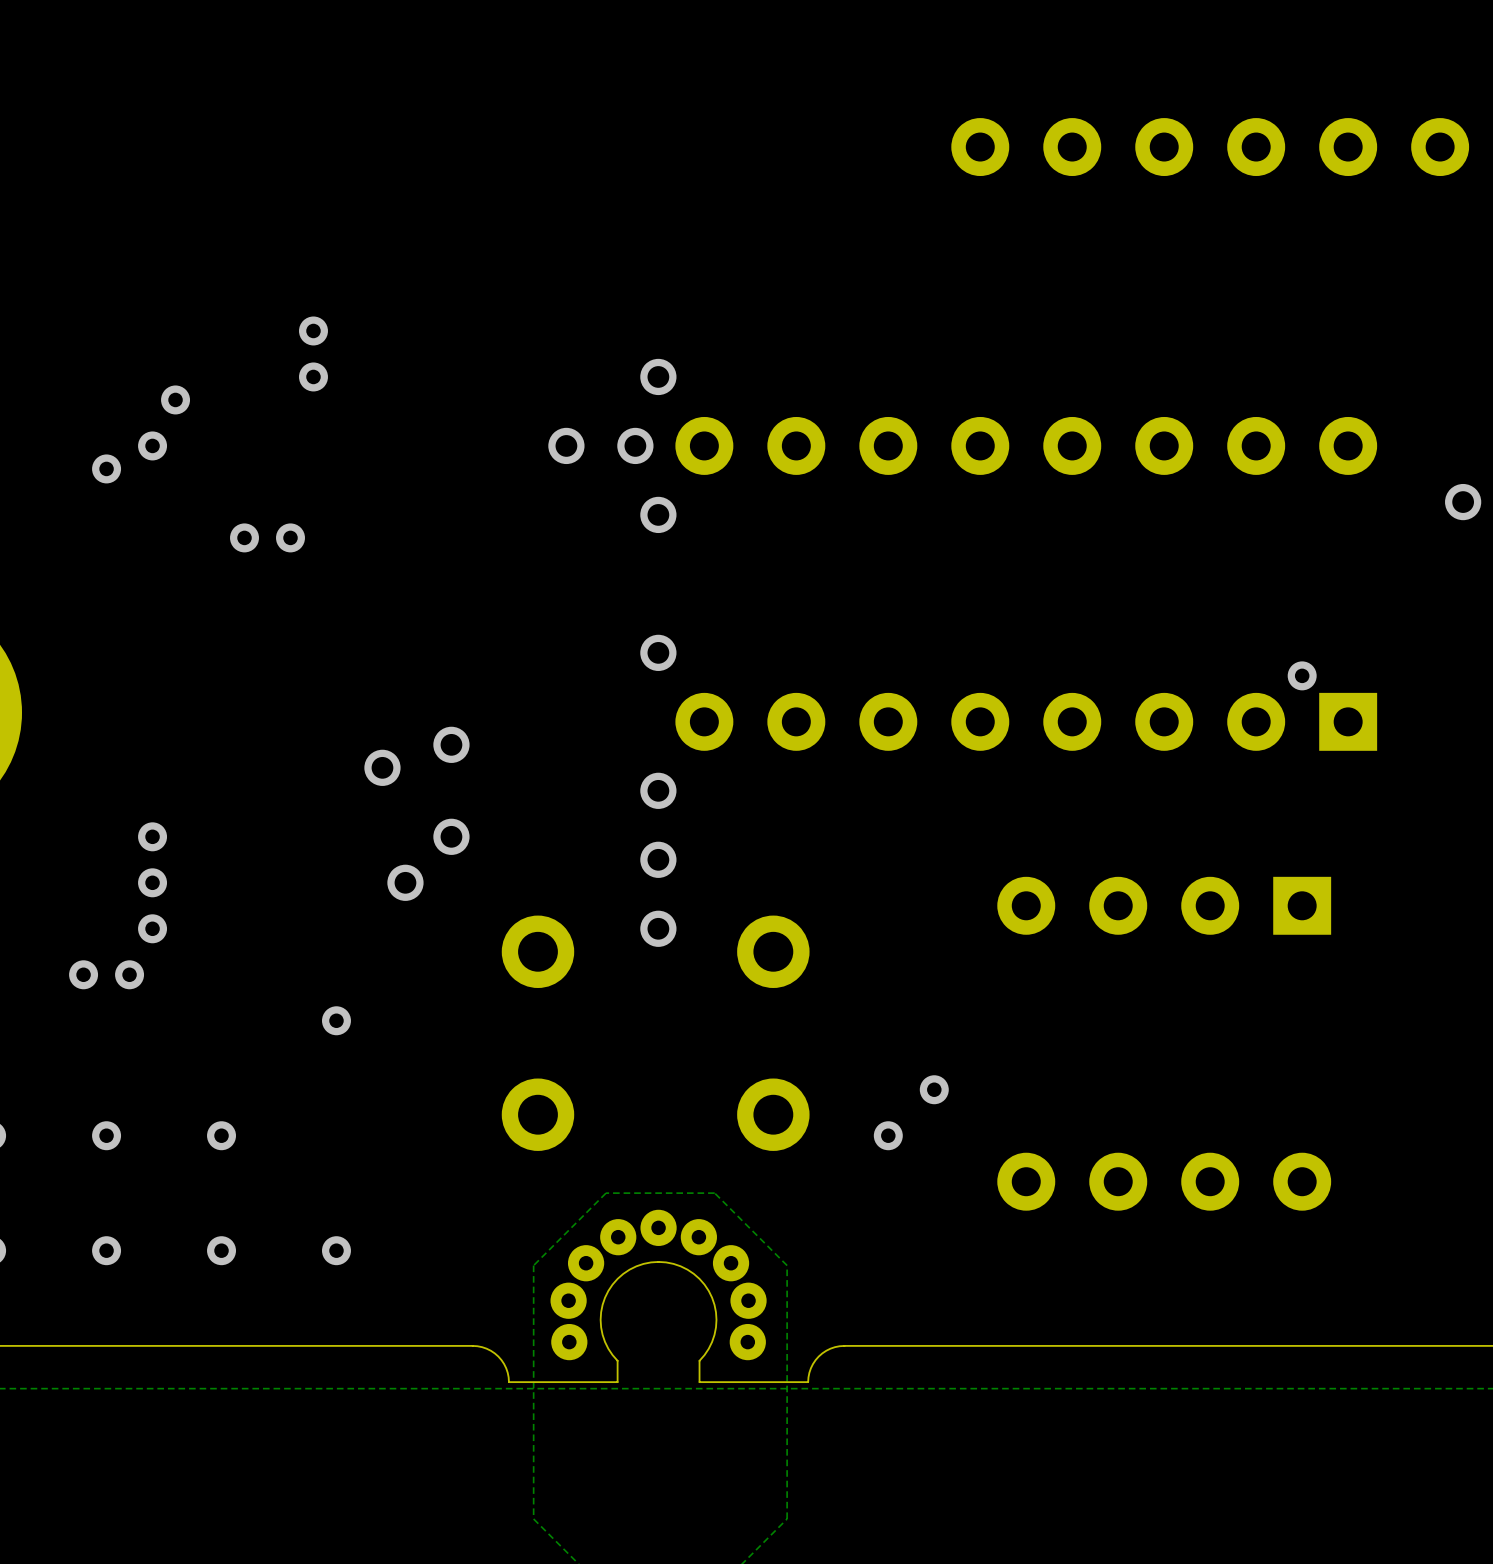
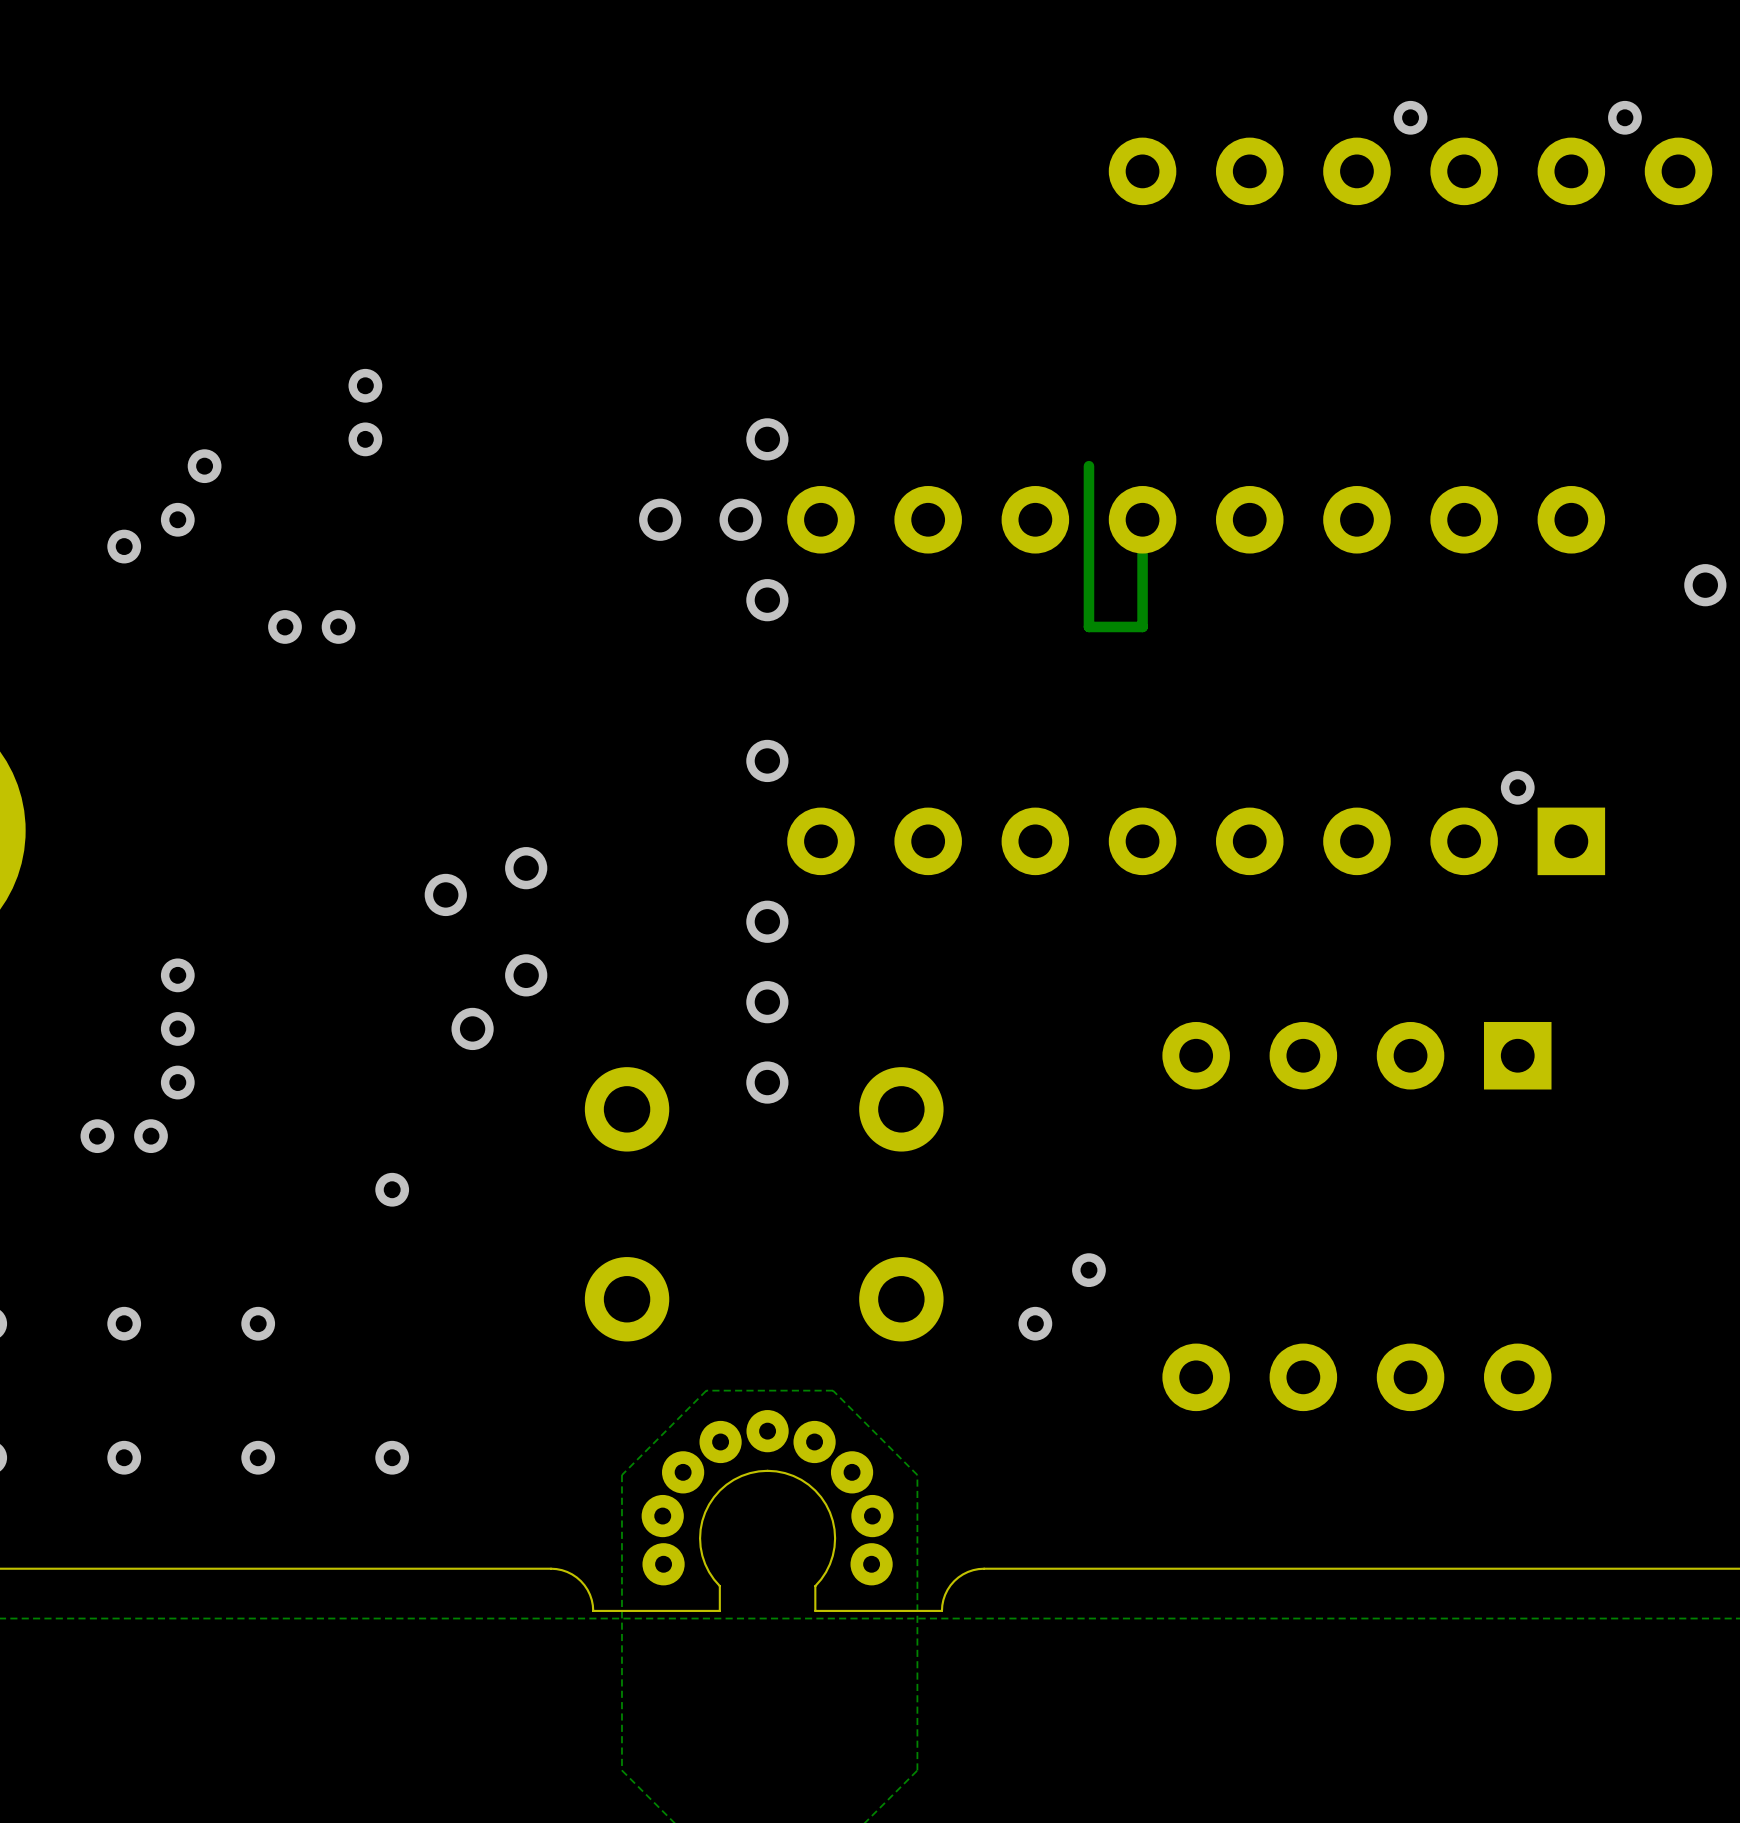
via: none -> (1410, 117)
via: none -> (1624, 117)
track: none -> (1088, 466) (1088, 626) (1142, 626) (1142, 519)

